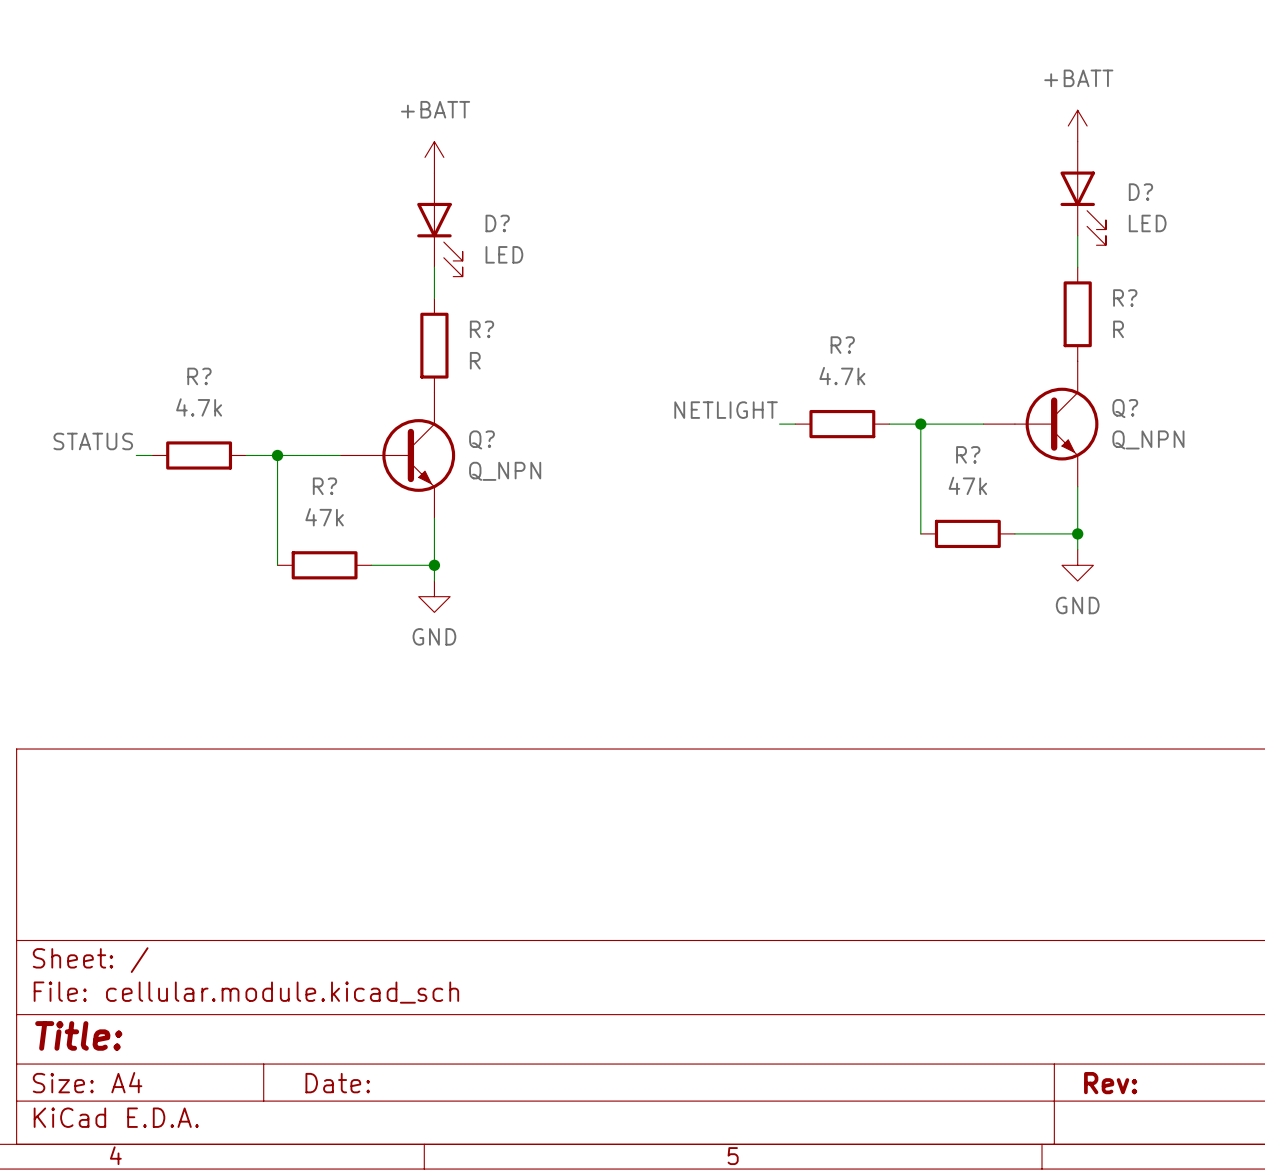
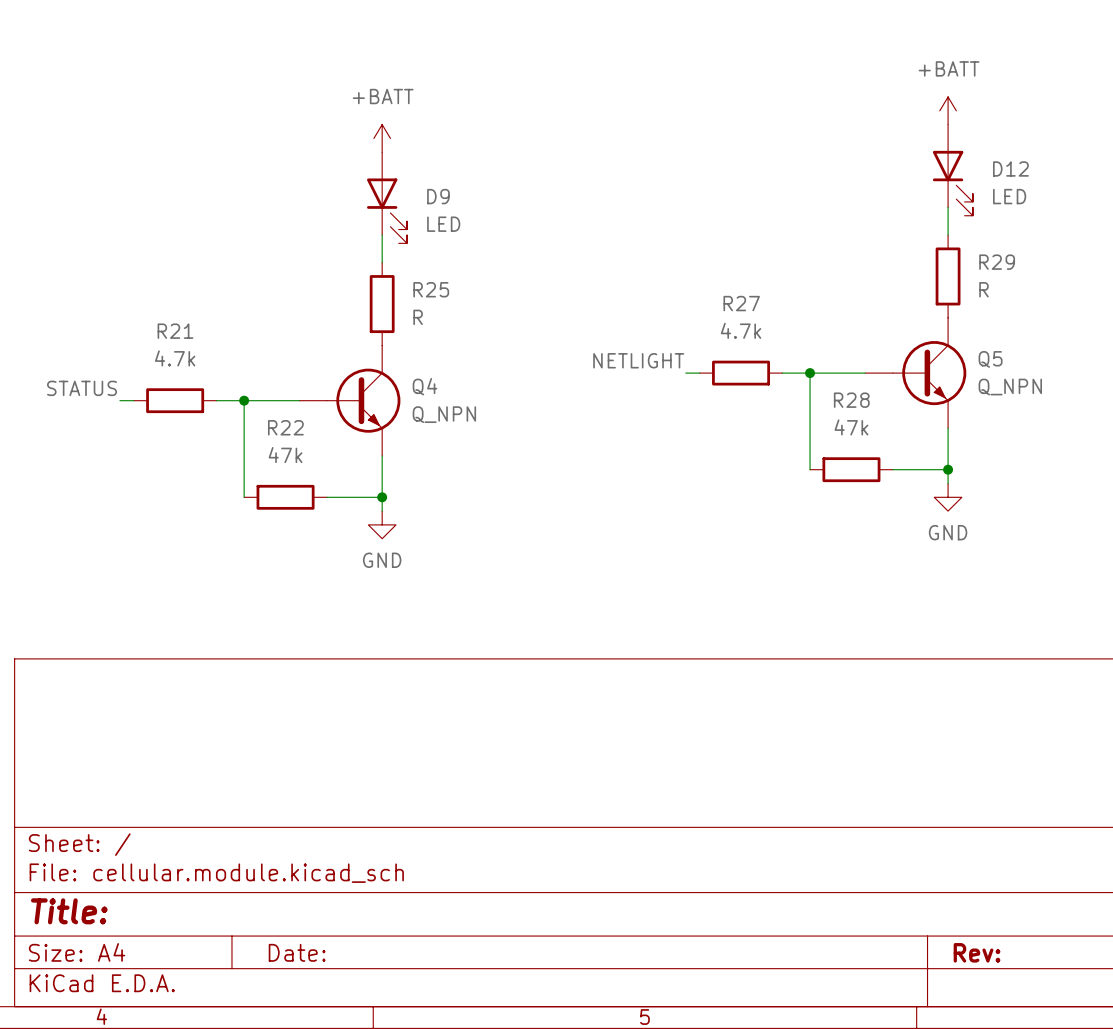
D? name: D? (1140, 192) -> D12 (1010, 168)
D? name: D? (497, 223) -> D9 (438, 196)
R? name: R? (1125, 297) -> R29 (997, 262)
R? name: R? (481, 329) -> R25 (431, 289)
R? name: R? (842, 345) -> R27 (741, 303)
R? name: R? (199, 376) -> R21 (175, 331)
Q? name: Q? (1125, 408) -> Q5 (990, 359)
Q? name: Q? (481, 439) -> Q4 (425, 386)
R? name: R? (968, 454) -> R28 (851, 400)
R? name: R? (324, 486) -> R22 (285, 427)

